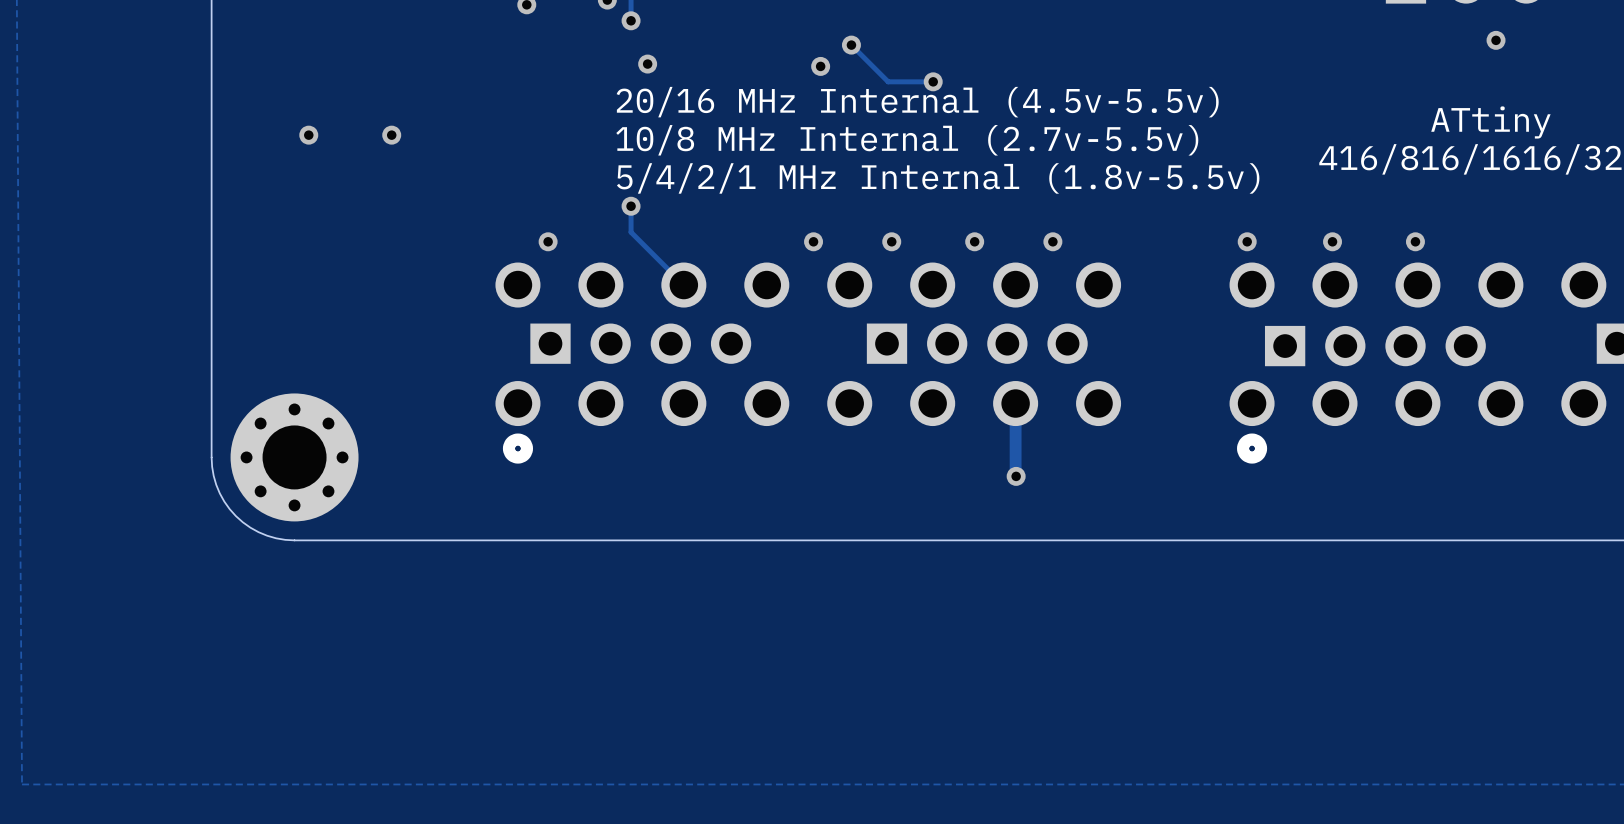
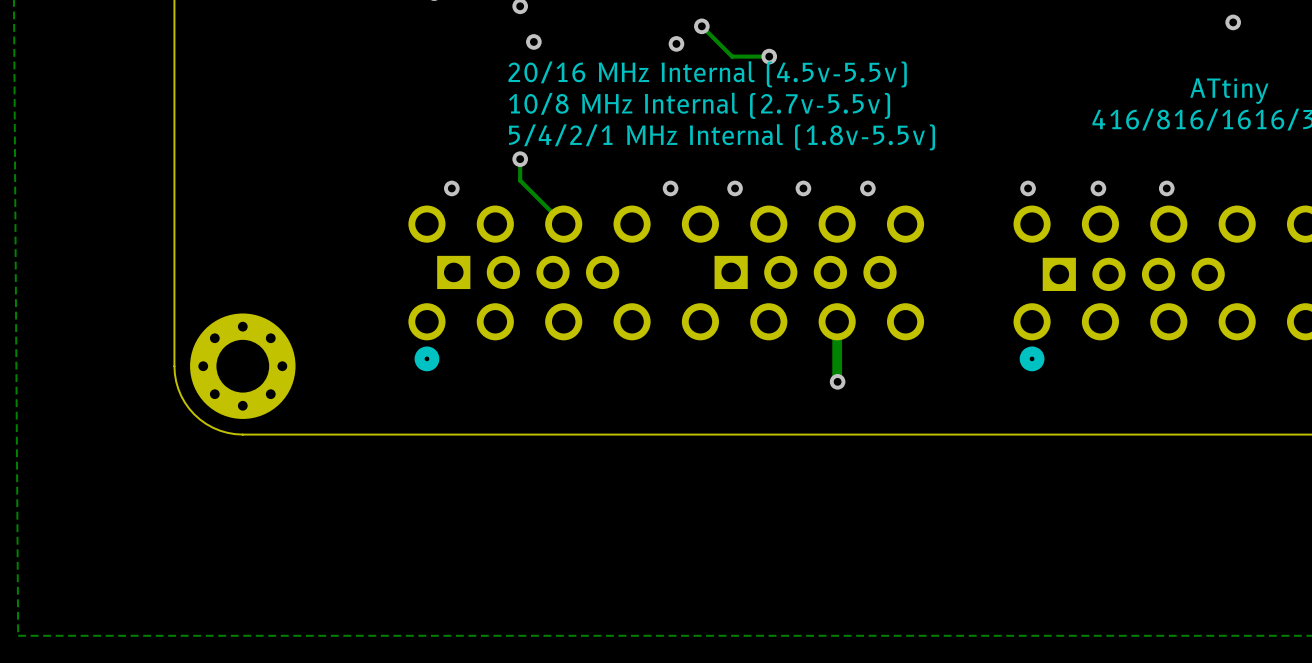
via: (308, 135) -> none
via: (391, 135) -> none

